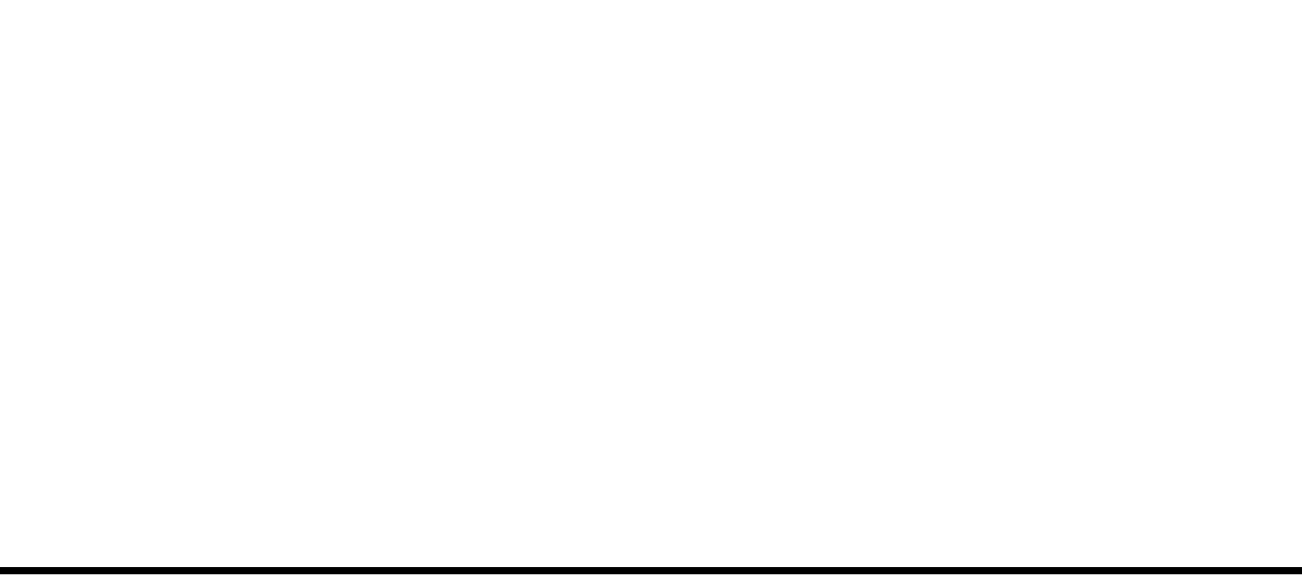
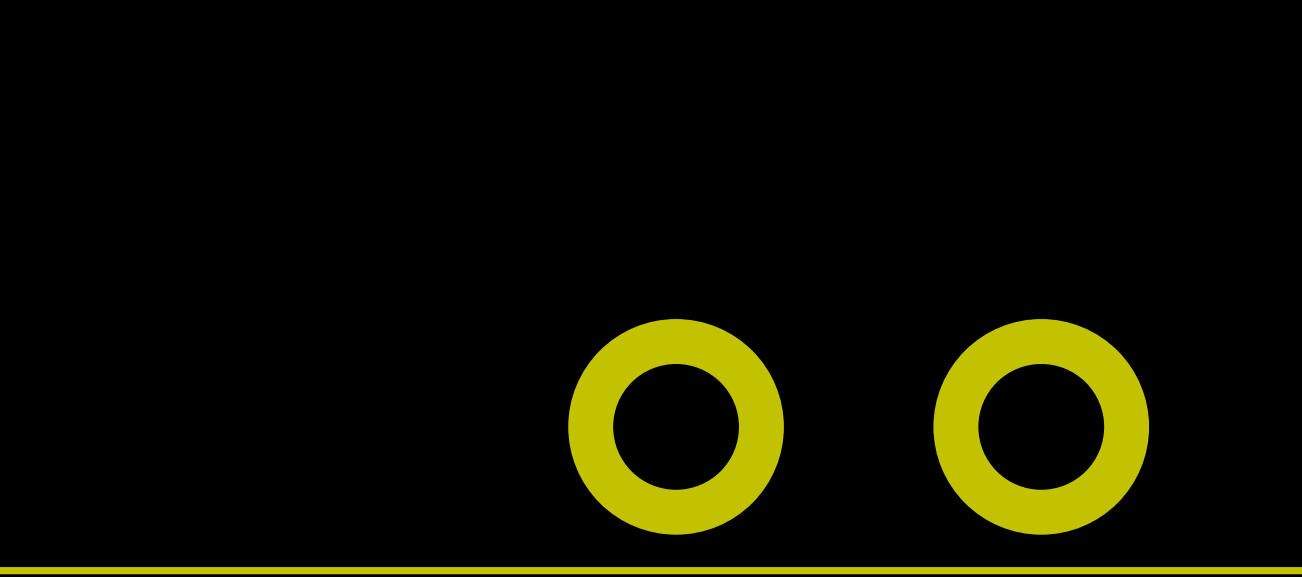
part: none -> (676, 426)
part: none -> (1041, 426)

